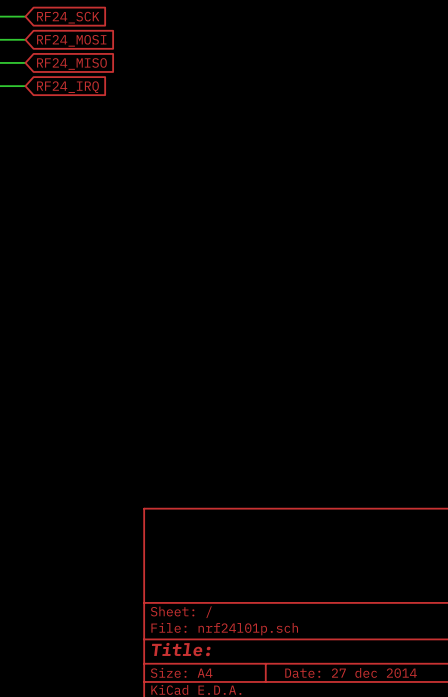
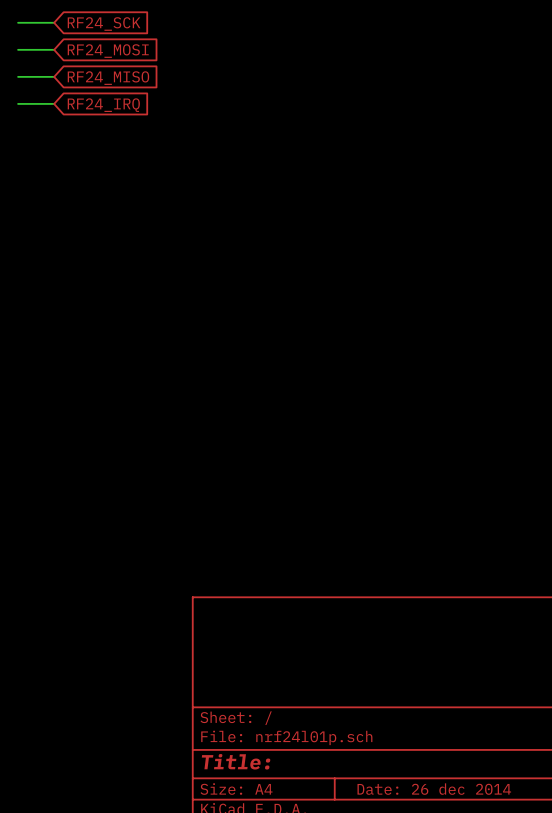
title block: Date: 27 dec 2014 (351, 672) -> Date: 26 dec 2014 (434, 789)

